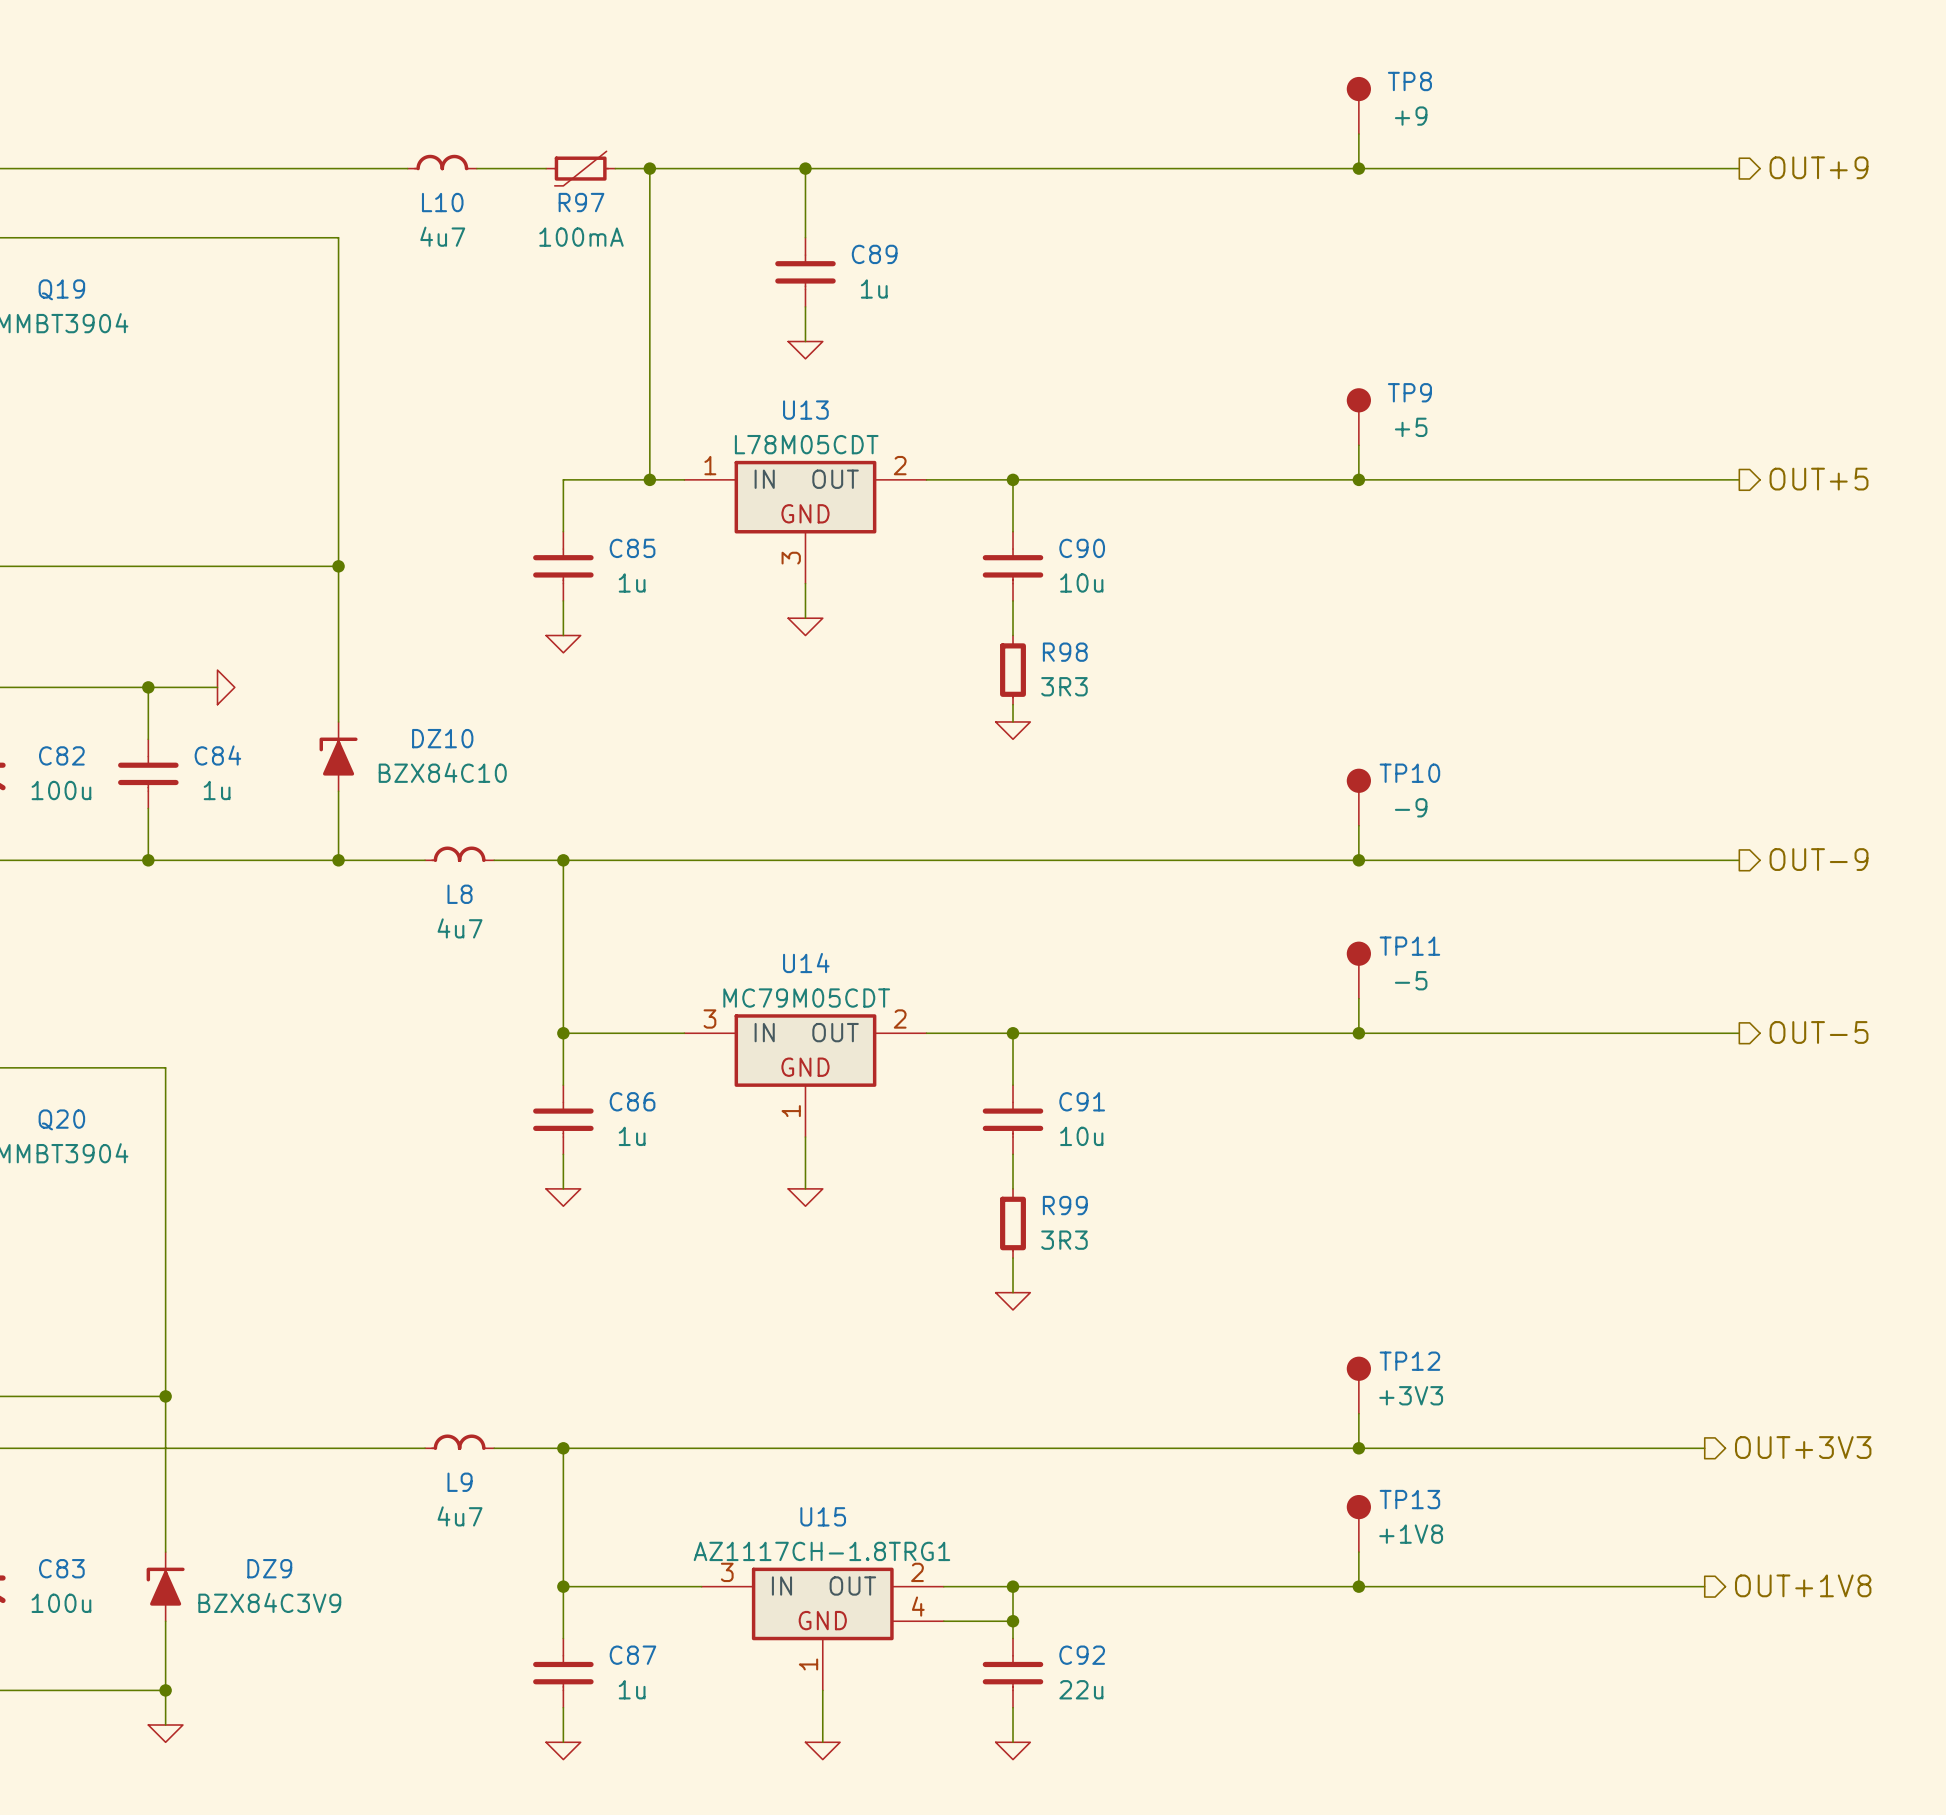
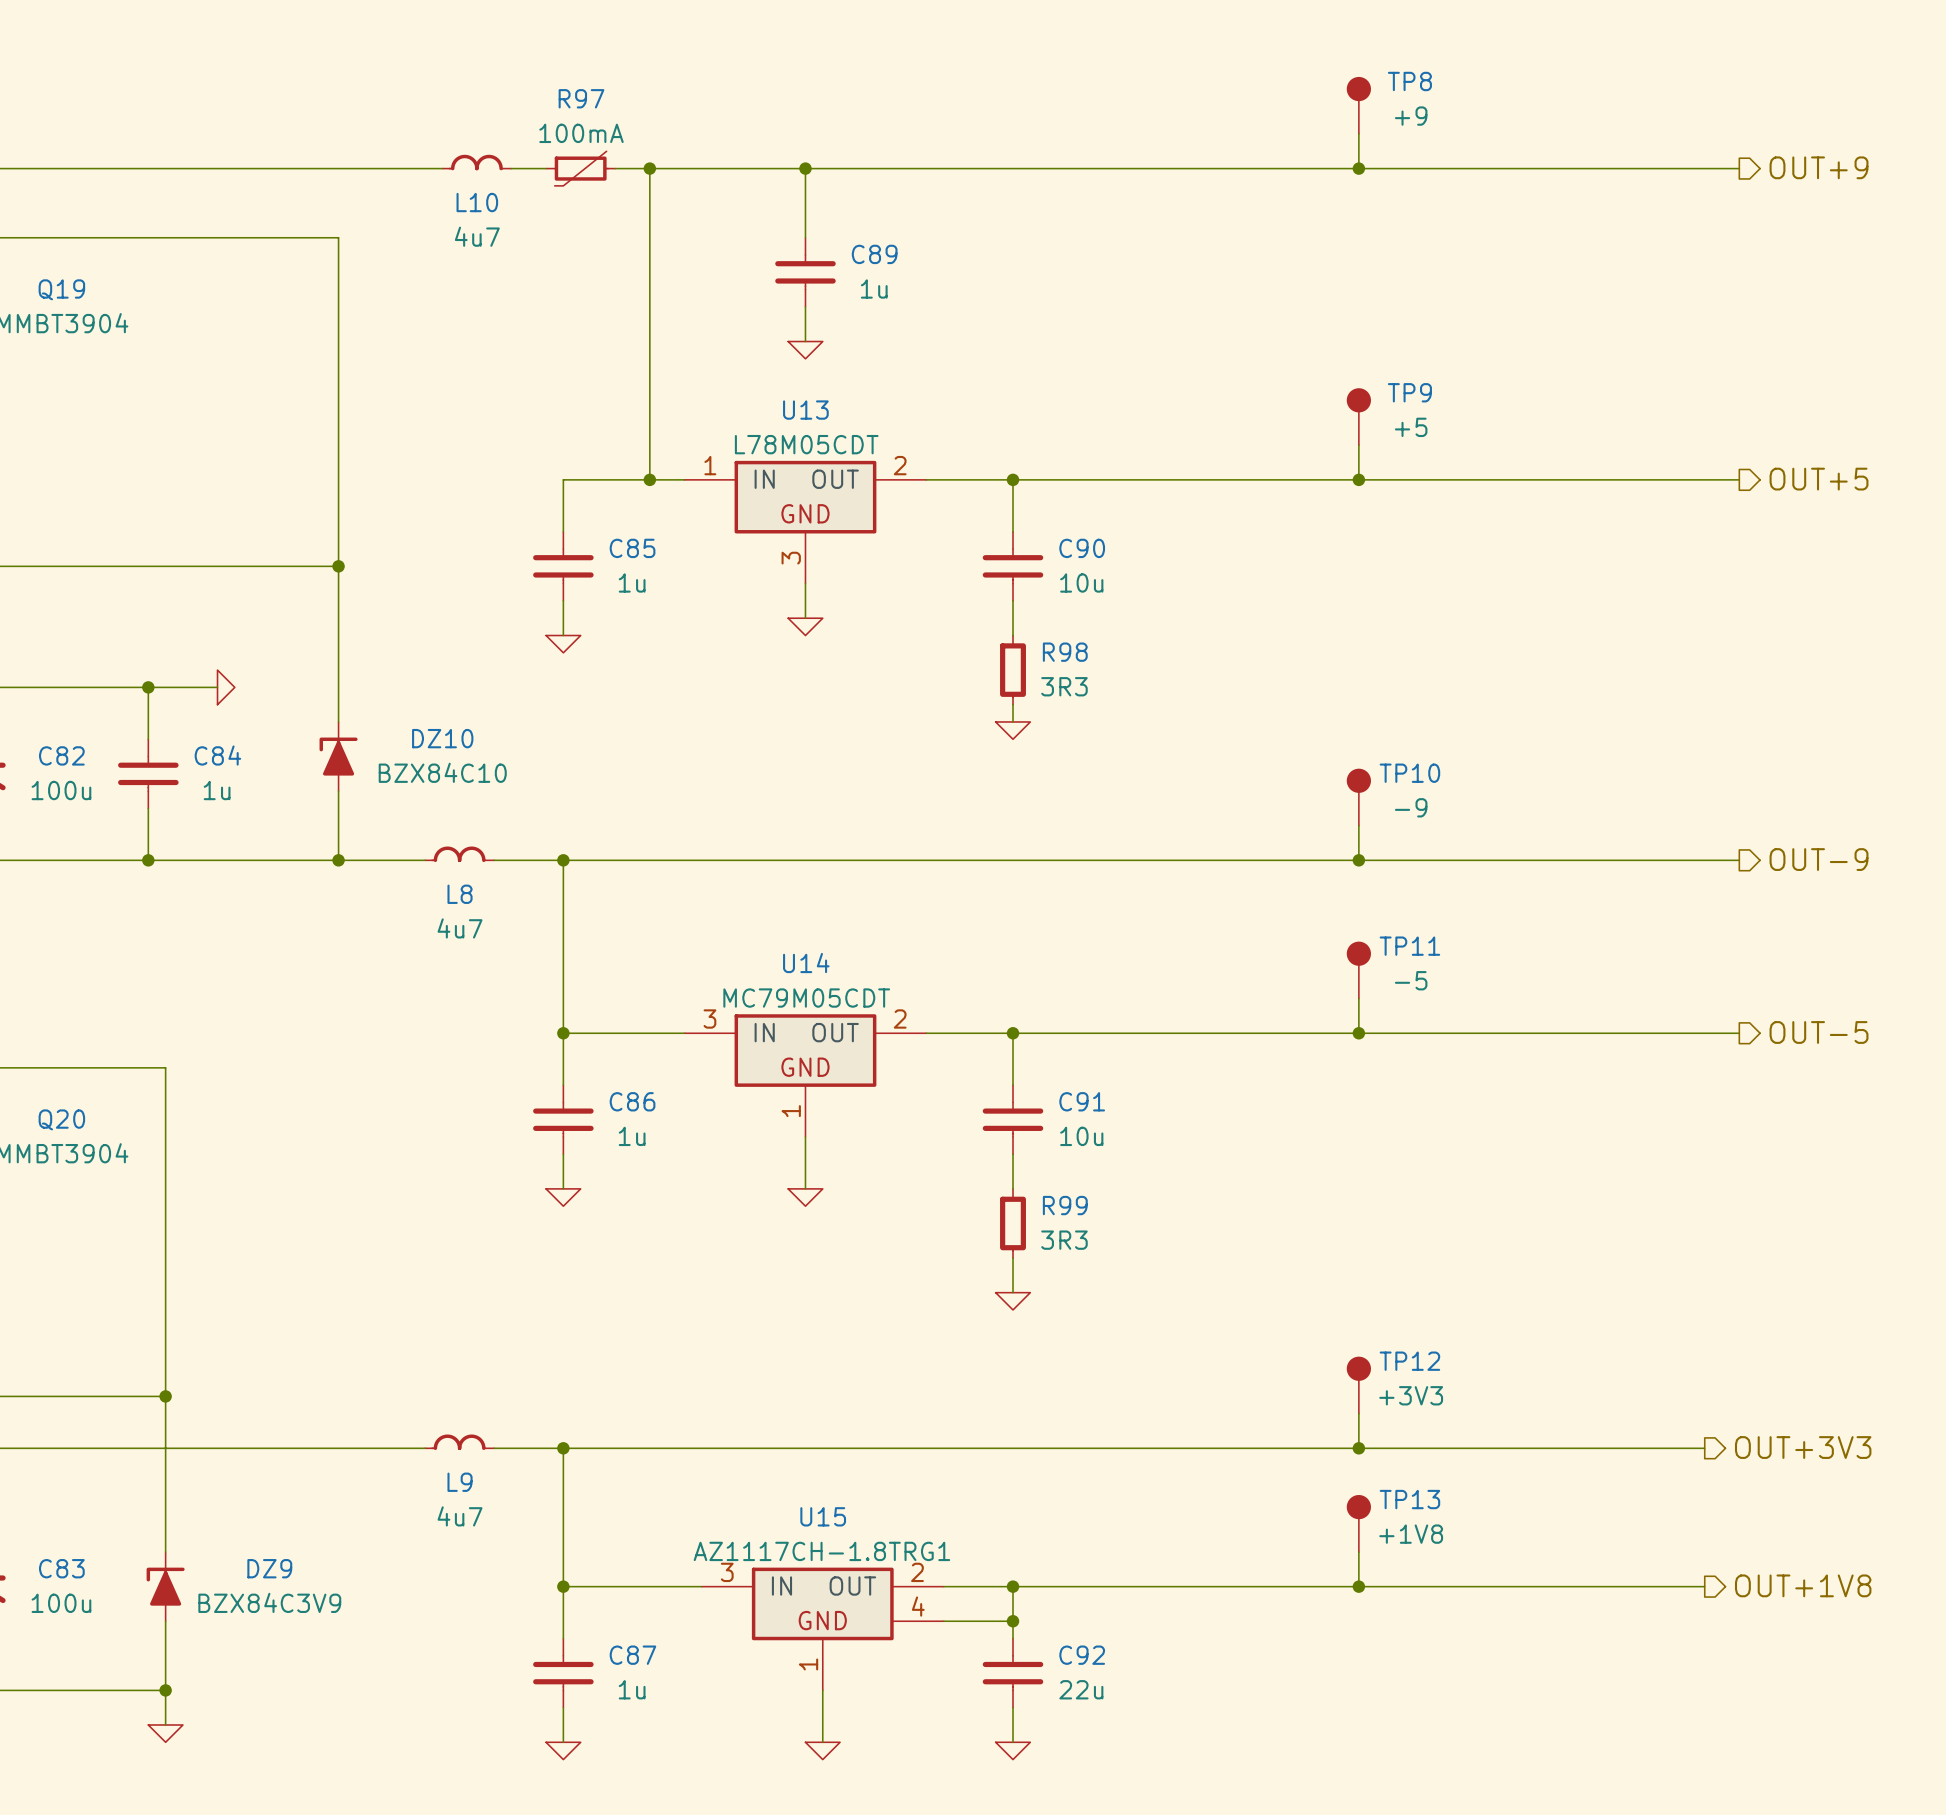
L10 position: (442, 162) -> (476, 162)
wire: (476, 168) (511, 168) -> (407, 168) (442, 168)
R97 name position: R97 (581, 202) -> R97 (581, 98)
R97 value position: 100mA (581, 237) -> 100mA (581, 133)

